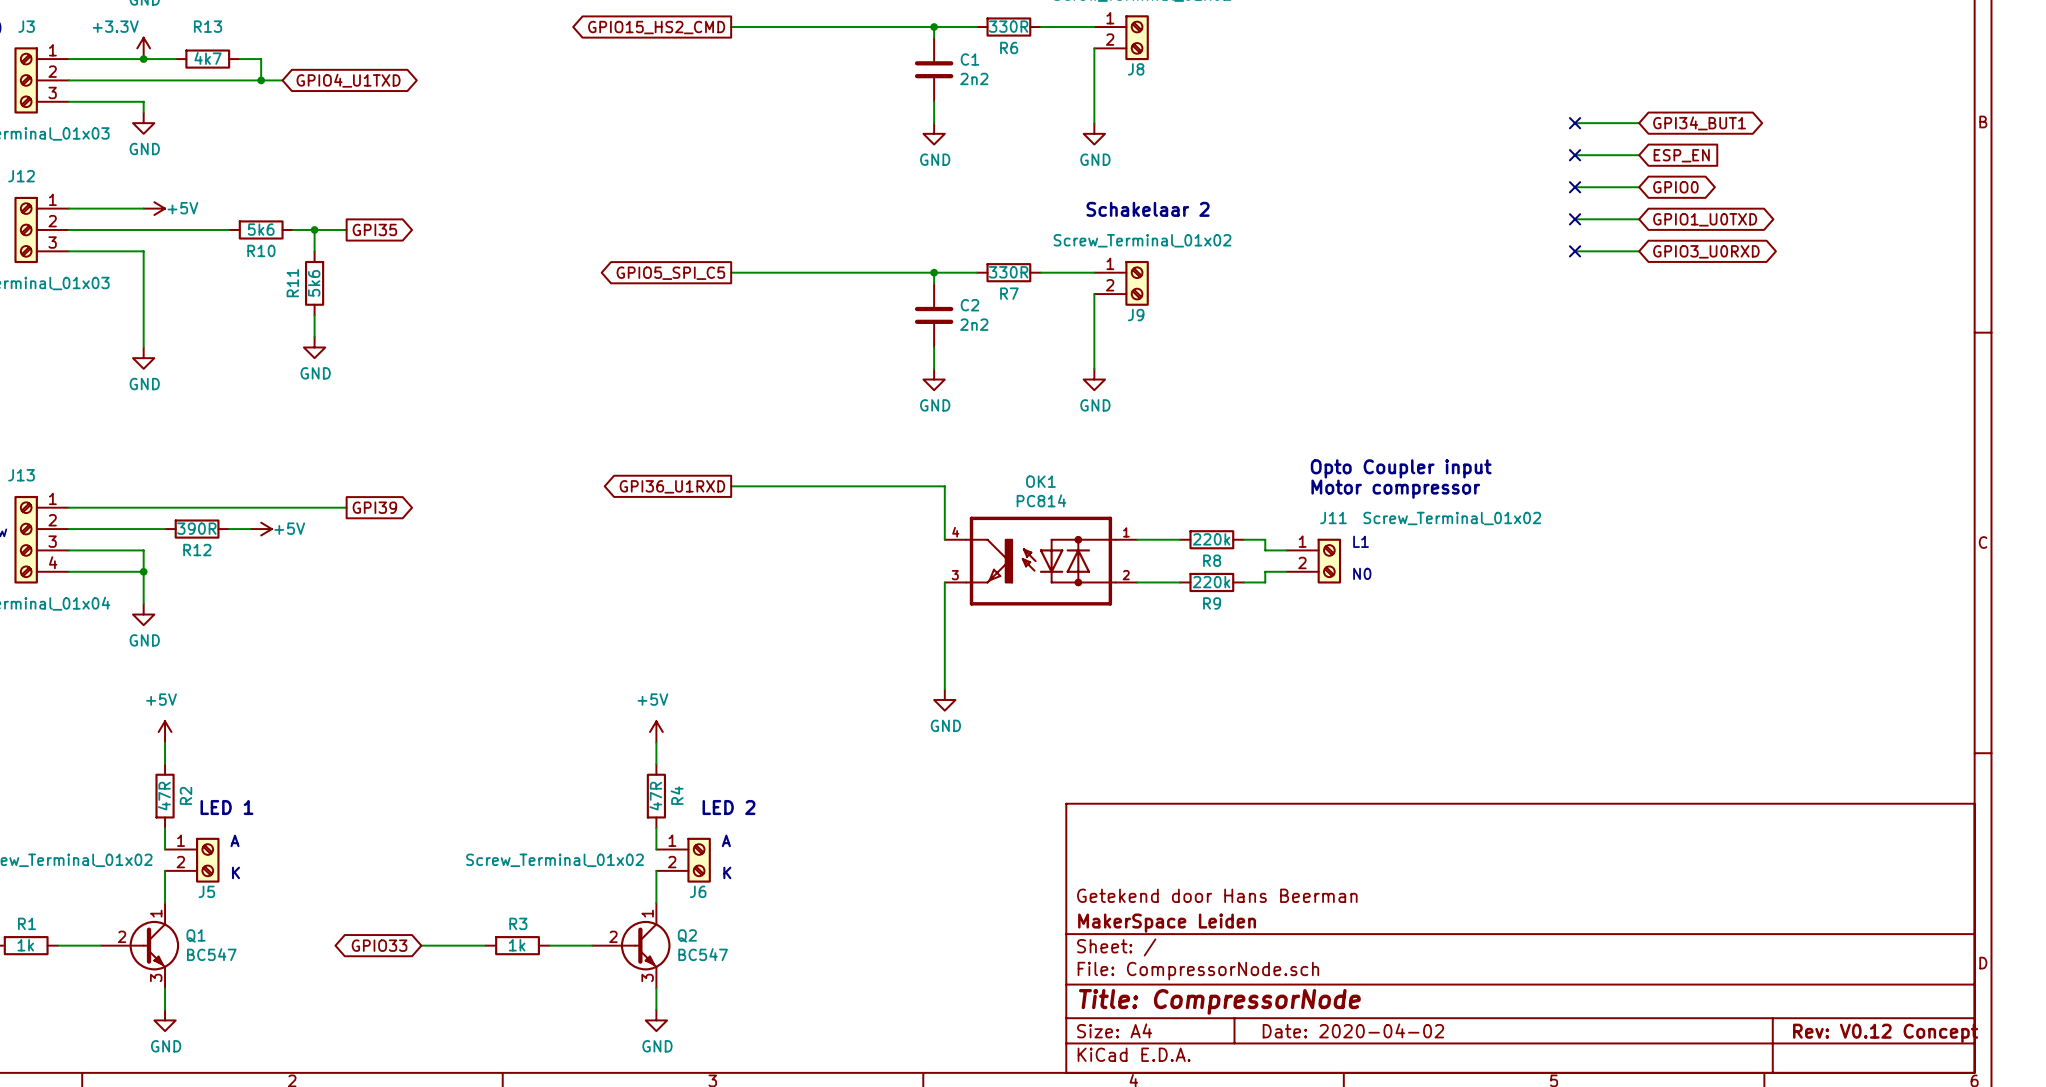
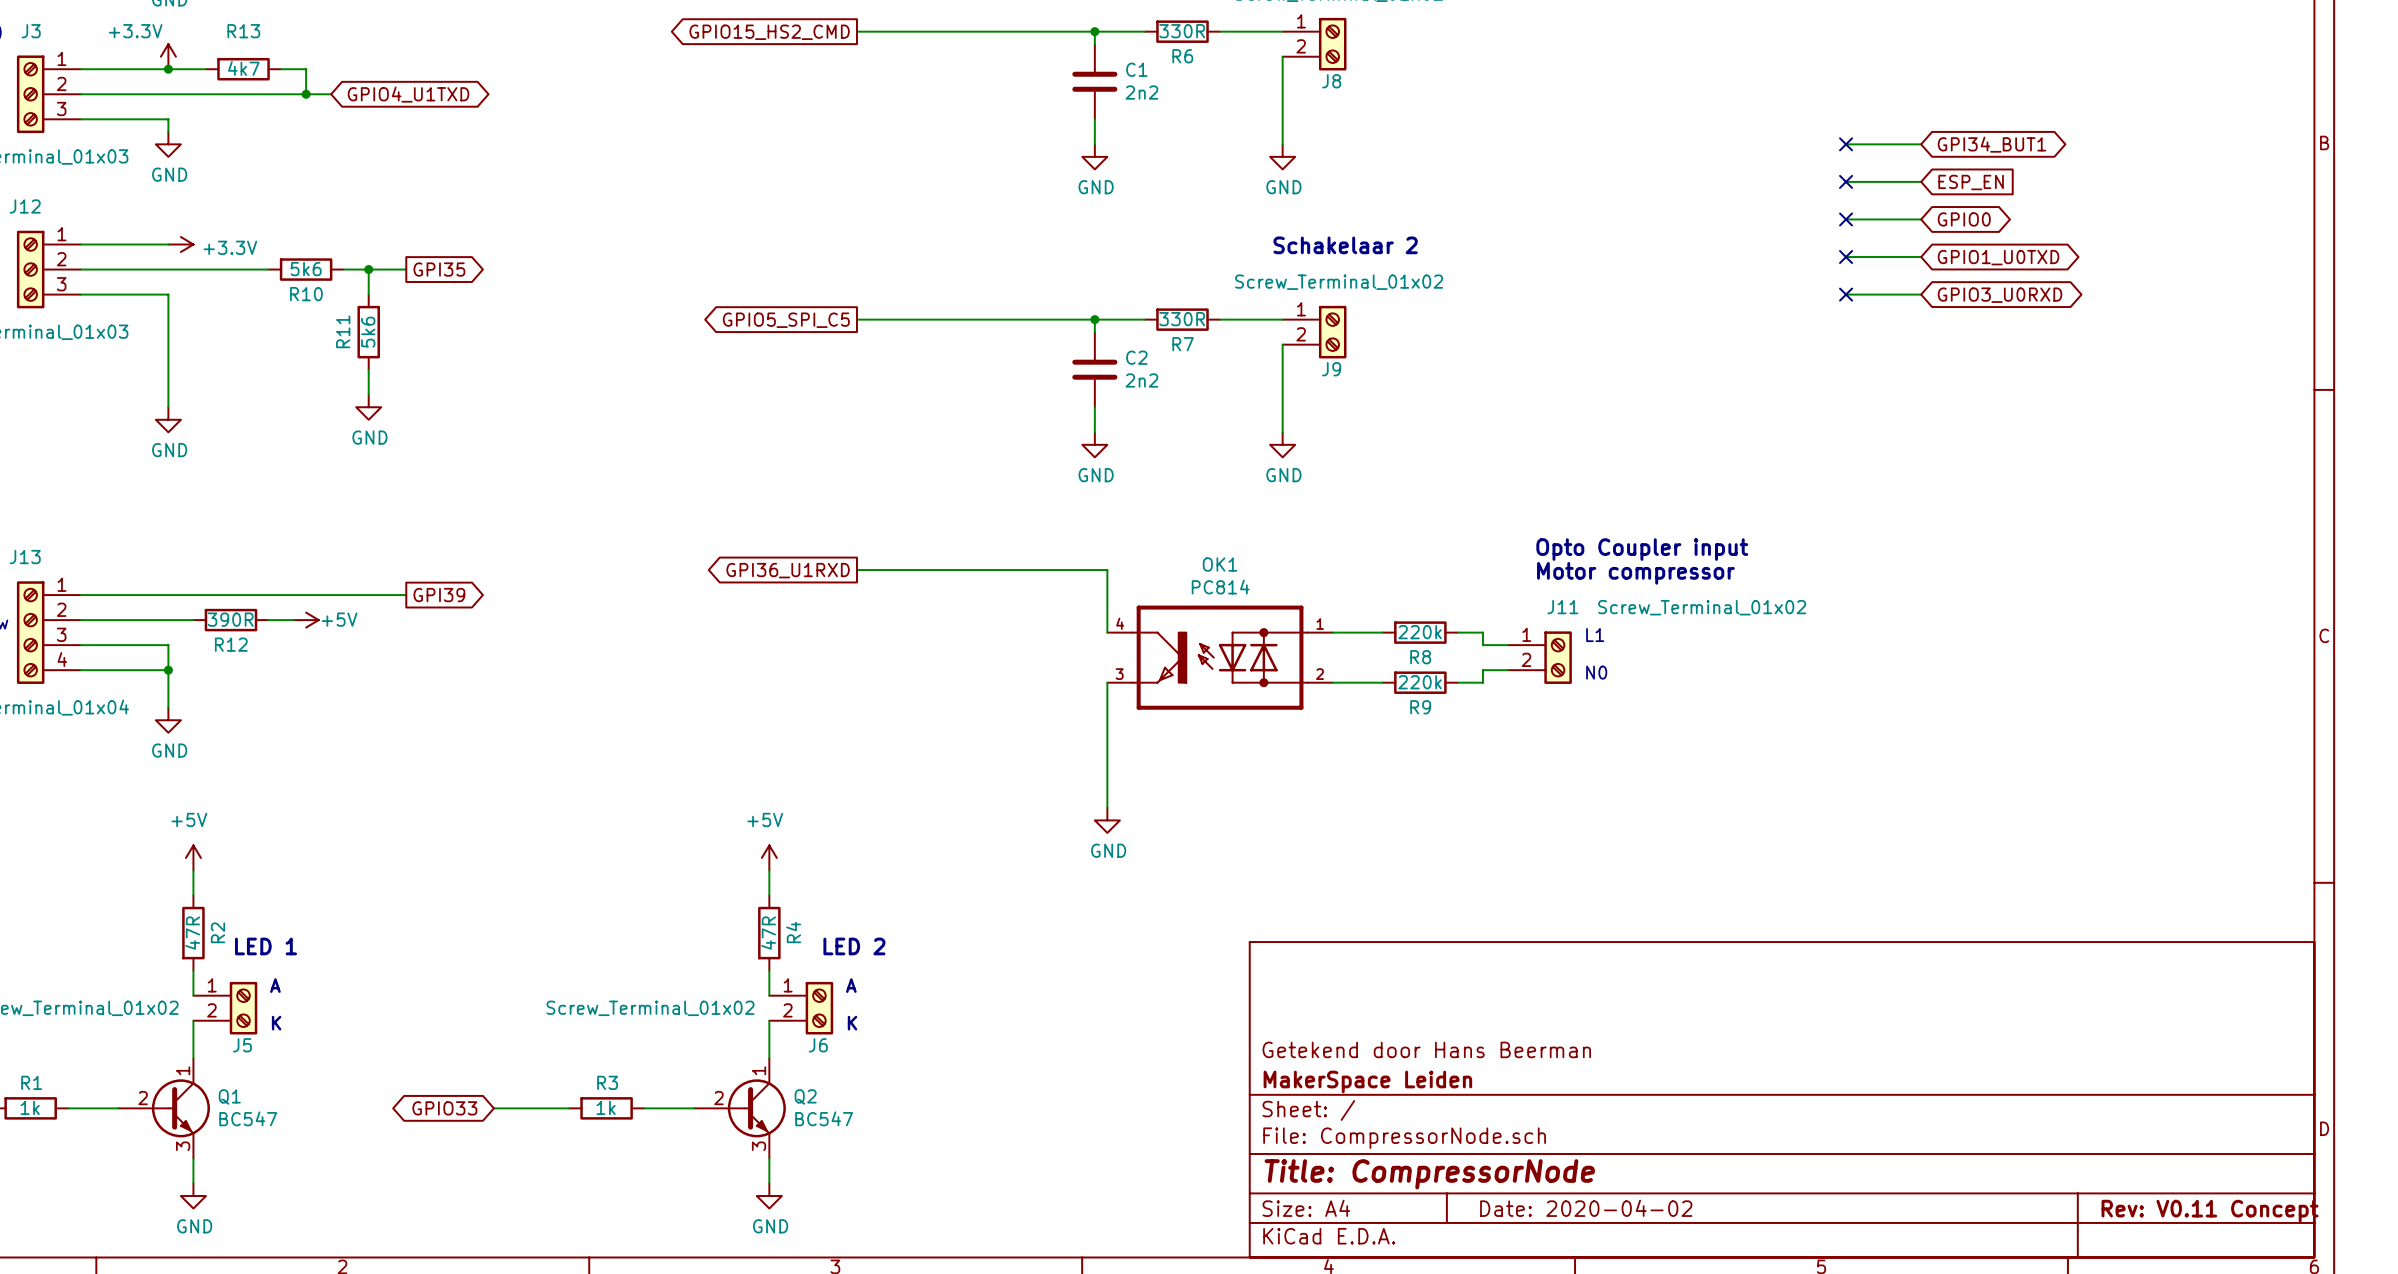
power symbol: +5V (154, 208) -> +3.3V (180, 244)
title block: Rev: V0.12 Concept (1885, 1033) -> Rev: V0.11 Concept (2210, 1211)

